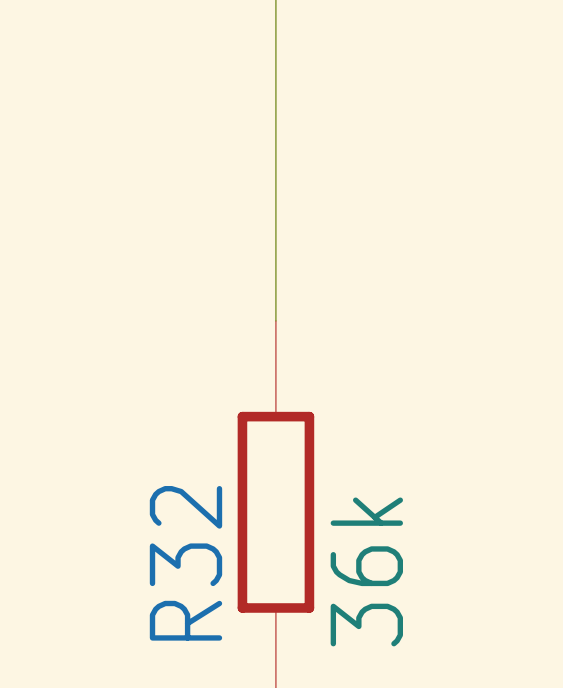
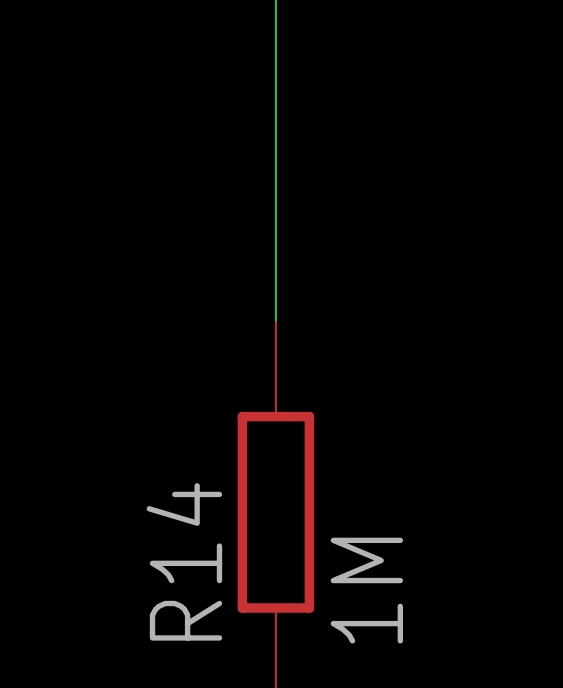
R32 name: R32 (185, 563) -> R14 (184, 561)
R32 value: 36k (366, 571) -> 1M (366, 590)

